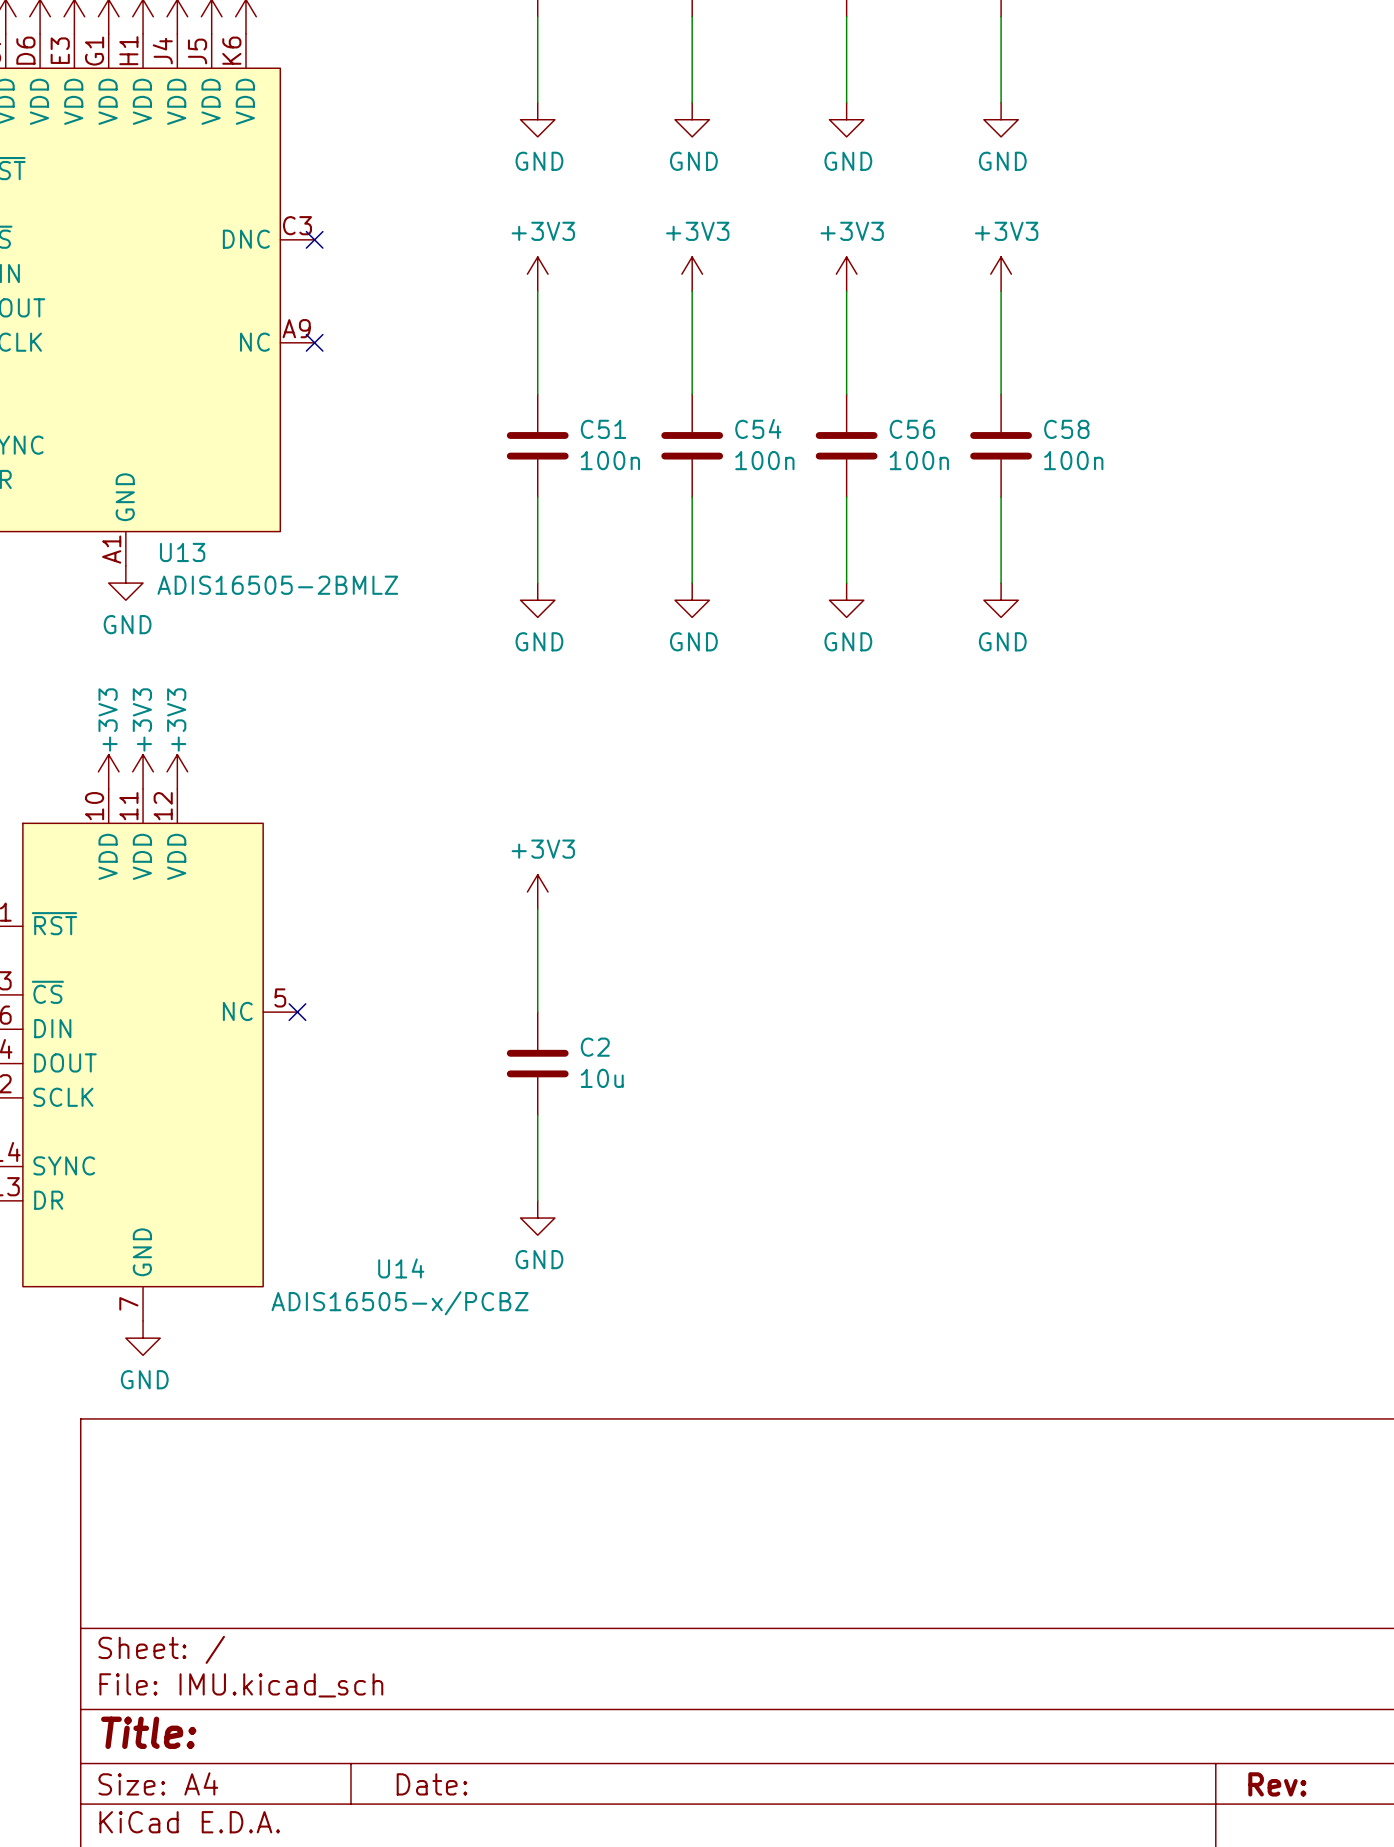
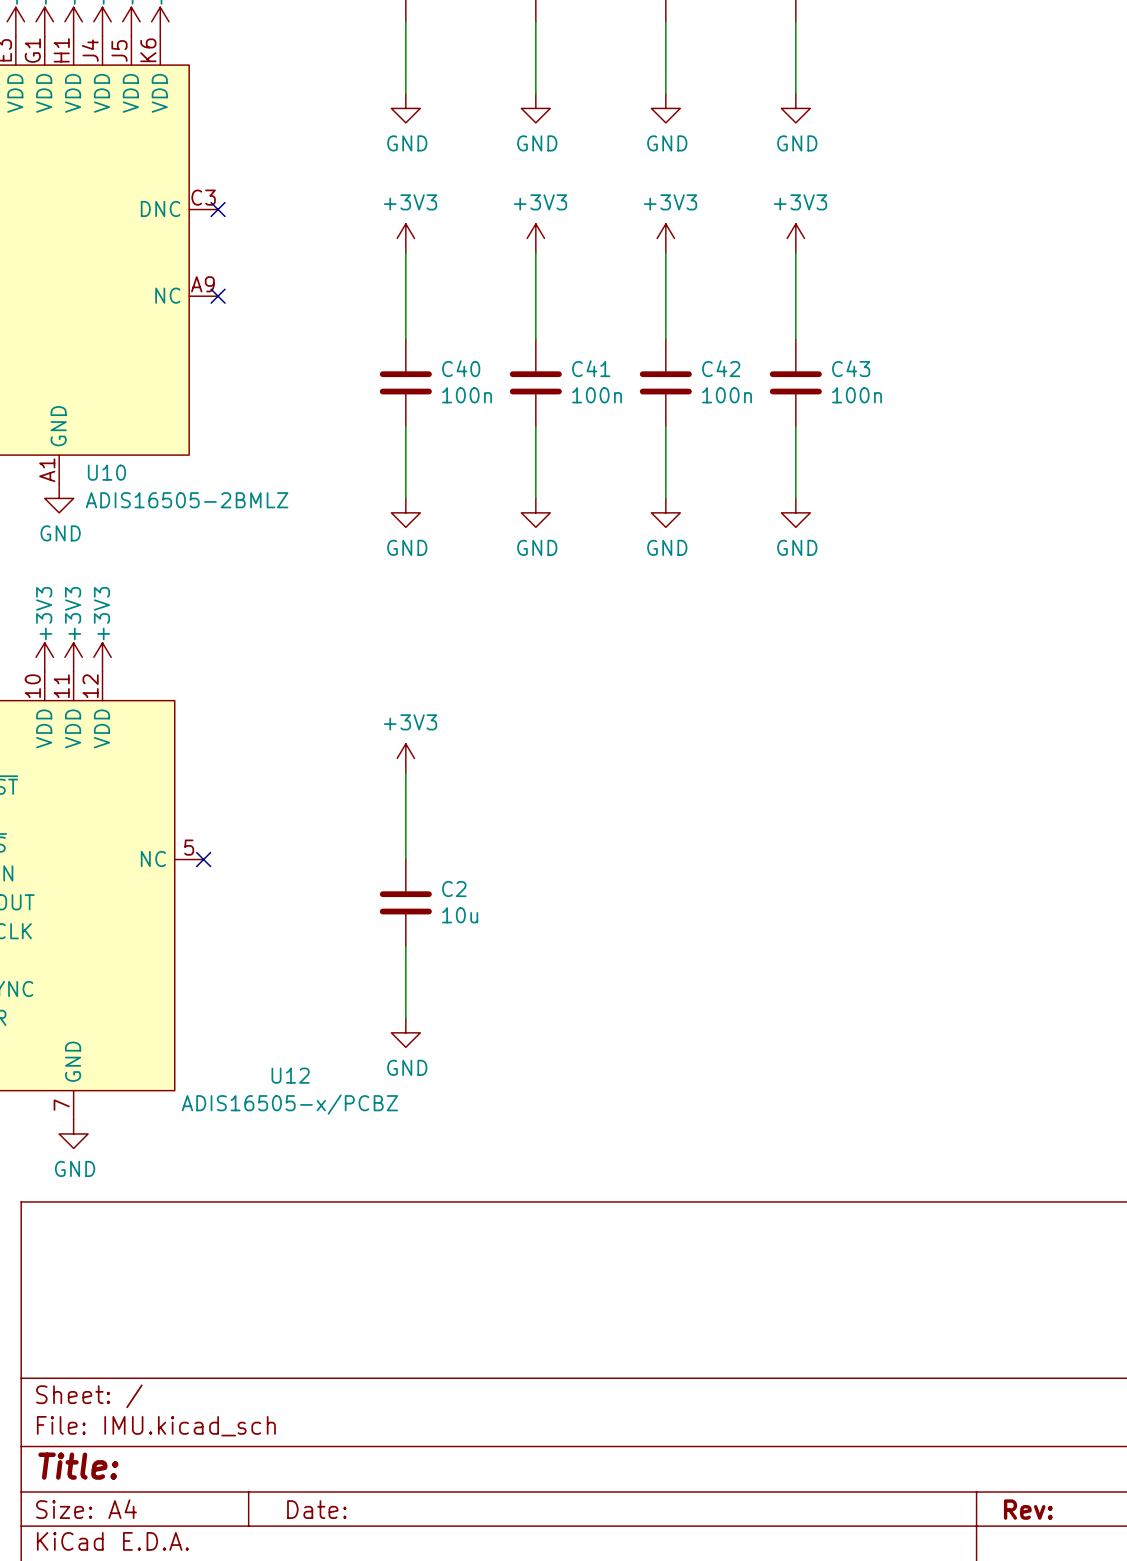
C54 name: C54 (758, 428) -> C41 (591, 368)
C51 name: C51 (603, 429) -> C40 (461, 368)
C56 name: C56 (912, 429) -> C42 (721, 368)
C58 name: C58 (1066, 429) -> C43 (851, 368)
U13 name: U13 (182, 552) -> U10 (106, 472)
U14 name: U14 (401, 1268) -> U12 (290, 1075)

